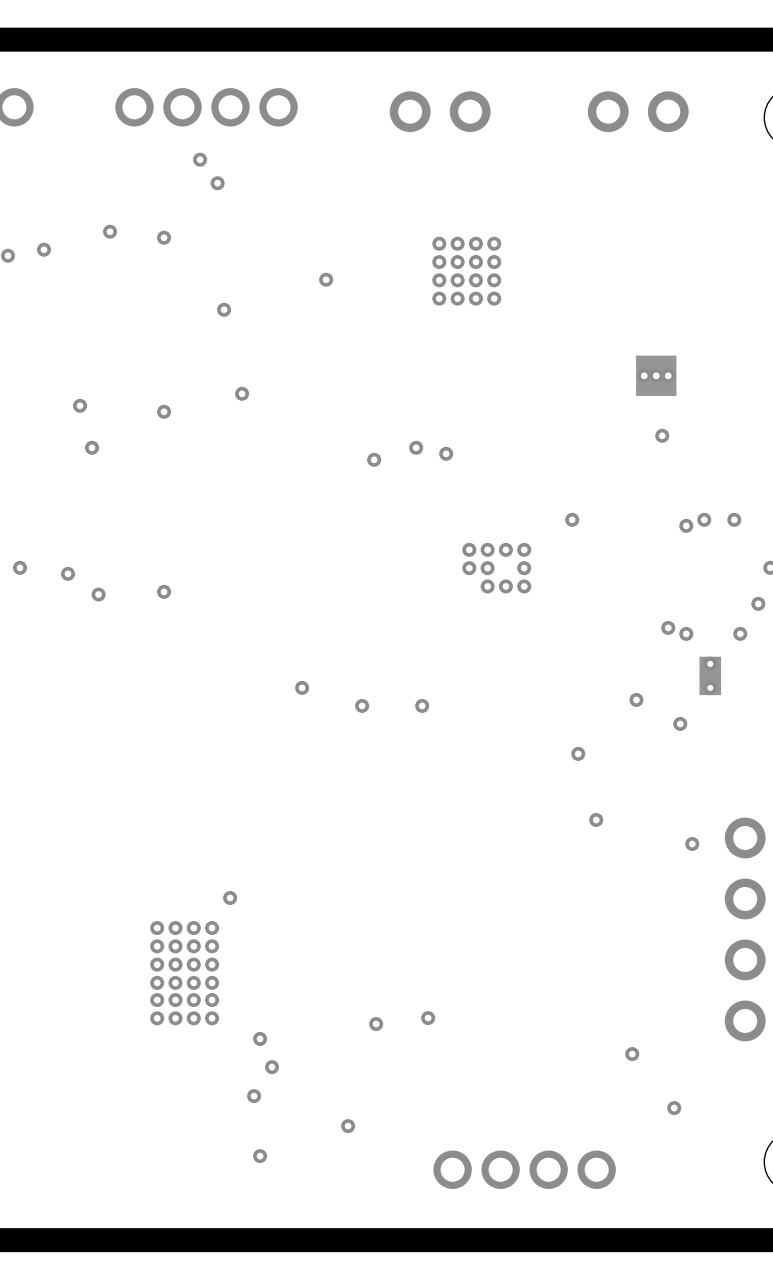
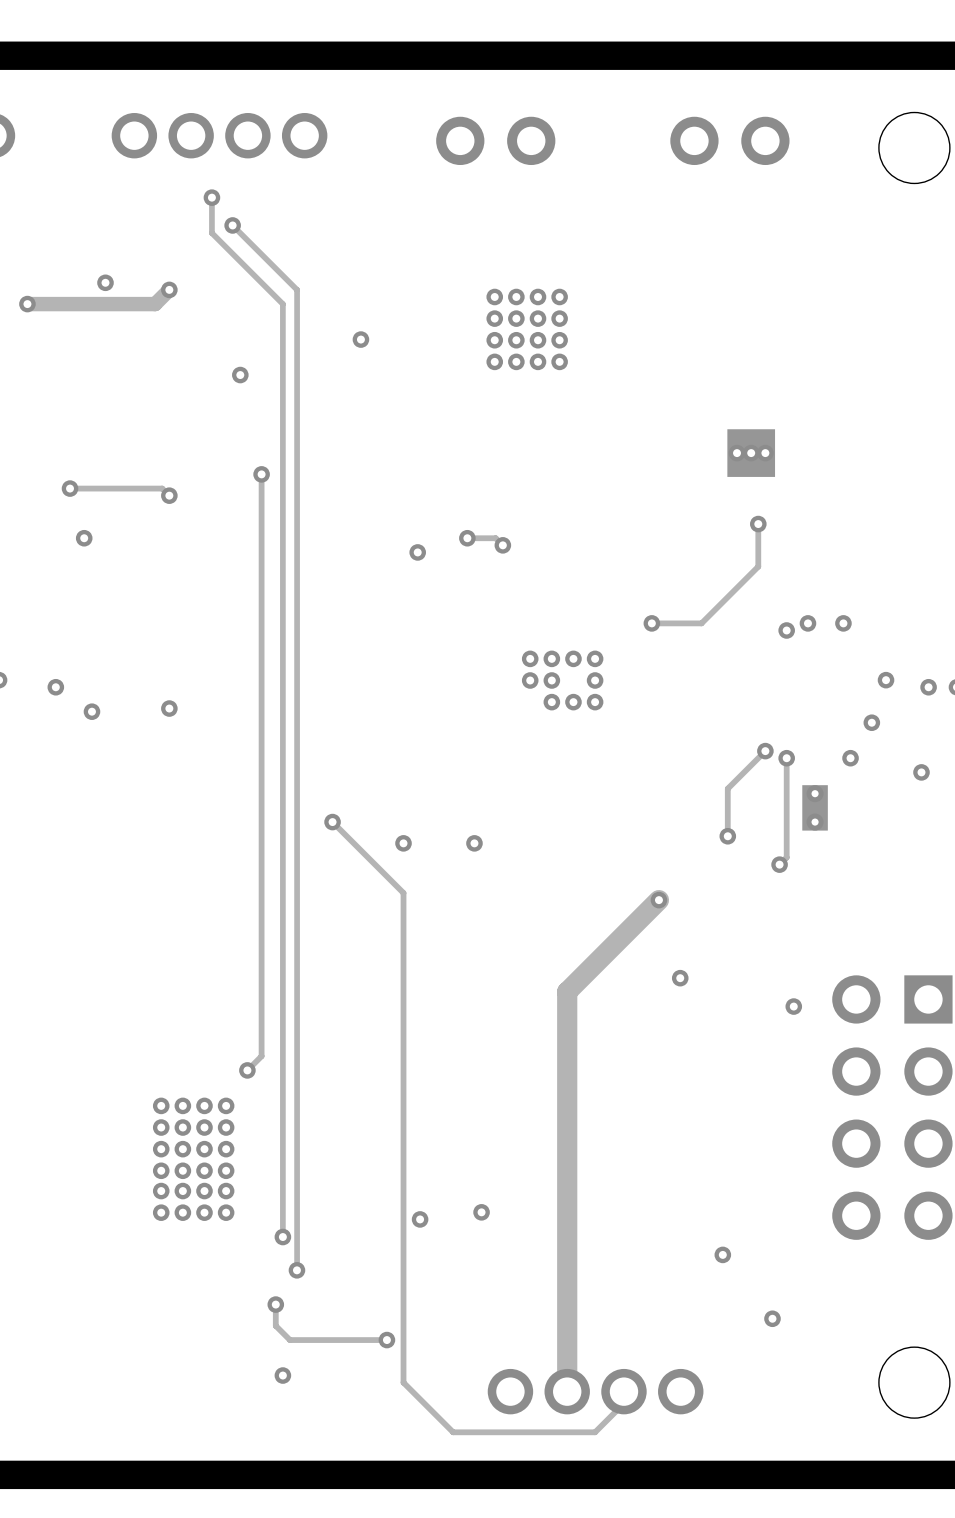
track: none -> (211, 197) (211, 233) (282, 304) (282, 1237)
track: none -> (232, 225) (297, 289) (297, 1270)
track: none -> (169, 289) (155, 304) (27, 304)
track: none -> (261, 474) (261, 1056) (247, 1070)
track: none -> (70, 488) (162, 488) (169, 495)
track: none -> (758, 524) (758, 566) (701, 623) (651, 623)
track: none -> (467, 538) (495, 538) (502, 545)
track: none -> (765, 751) (727, 788) (727, 836)
track: none -> (786, 758) (786, 857) (779, 864)
track: none -> (332, 822) (403, 893) (403, 1382) (453, 1432) (595, 1432) (623, 1403) (623, 1391)
track: none -> (658, 900) (567, 991) (567, 1391)
track: none -> (275, 1304) (275, 1325) (289, 1340) (386, 1340)

